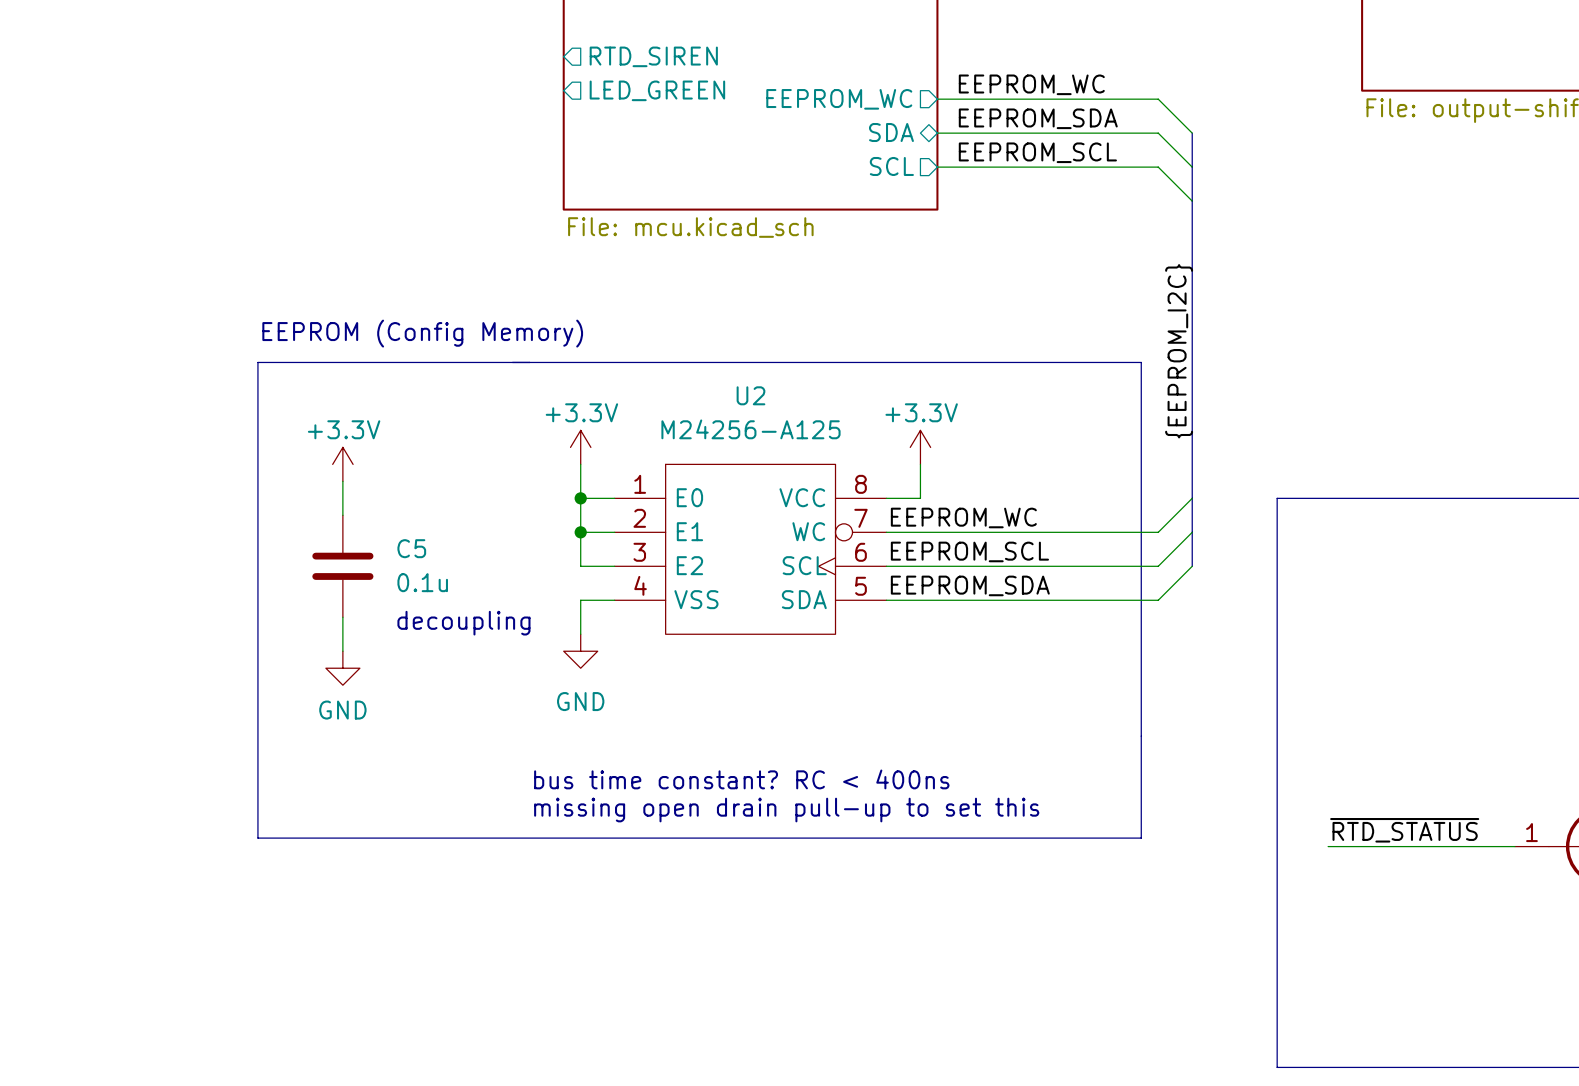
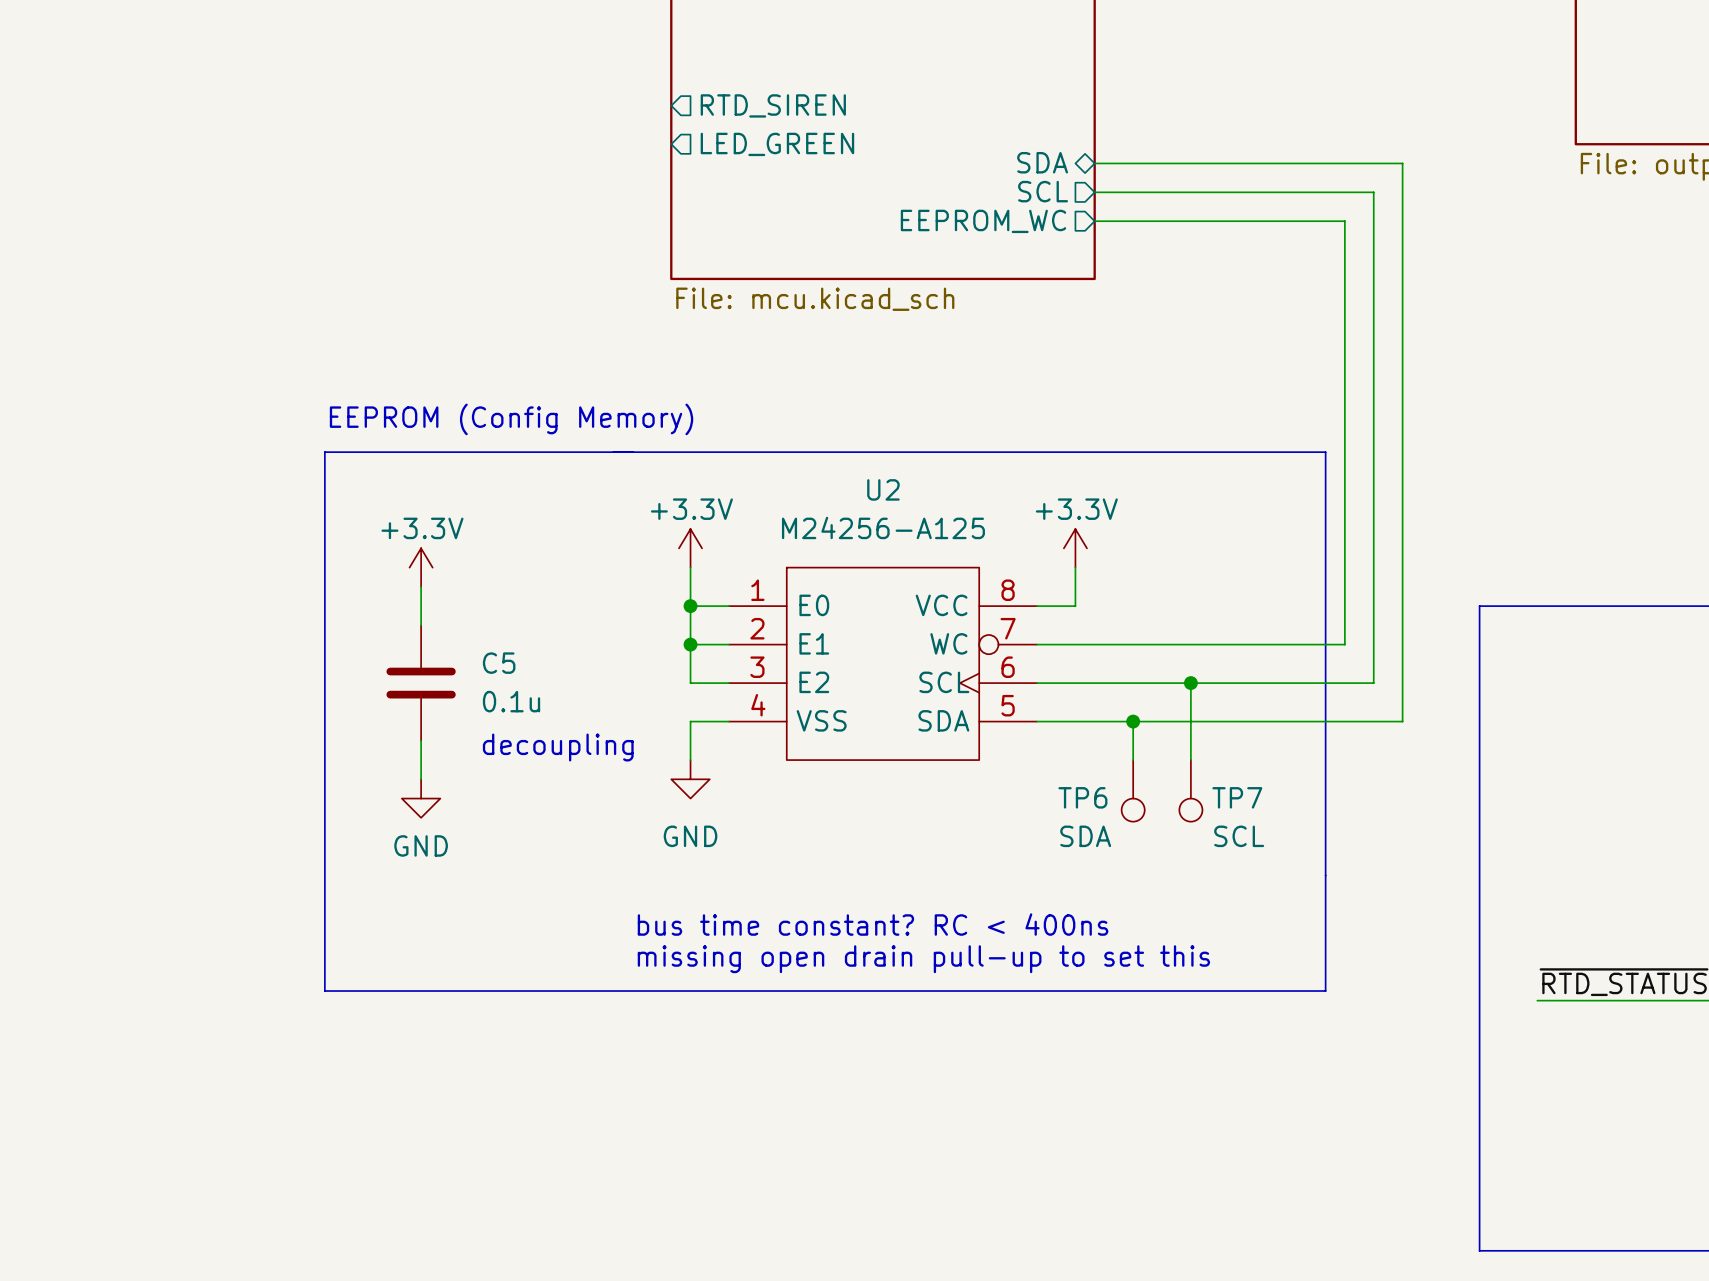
label: EEPROM_WC (1031, 84) -> none
sheet pin position: EEPROM_WC (839, 99) -> EEPROM_WC (983, 221)
wire: (937, 99) (1158, 99) (1192, 133) -> none
sheet pin: none -> SDA (1042, 162)
label: EEPROM_SDA (1038, 118) -> none
sheet pin shape: bidirectional (891, 132) -> output (1043, 191)
sheet pin: SDA (891, 132) -> SCL (1043, 191)
wire: (1158, 133) (1192, 167) -> (1344, 192) (1373, 192) (1373, 683) (1344, 683)
bus: (1192, 133) (1192, 566) -> none
label: EEPROM_SCL (1037, 152) -> none
sheet pin: SCL (891, 166) -> none
wire: (937, 167) (1158, 167) (1192, 201) -> none
label: {EEPROM_I2C} (1179, 351) -> none
wire: (1192, 498) (1158, 532) -> (1094, 221) (1344, 221) (1344, 644)
label: EEPROM_WC (963, 517) -> none
wire: (1192, 532) (1158, 566) -> none
label: EEPROM_SCL (969, 551) -> none
wire: none -> (1190, 683) (1190, 760)
junction: none -> (1190, 683)
wire: (1192, 566) (1158, 600) -> (1094, 163) (1402, 163) (1402, 721) (1344, 721)
label: EEPROM_SDA (970, 585) -> none
wire: none -> (1133, 721) (1133, 760)
junction: none -> (1133, 721)
TP6: none -> SDA (1133, 790)
TP7: none -> SCL (1190, 790)

